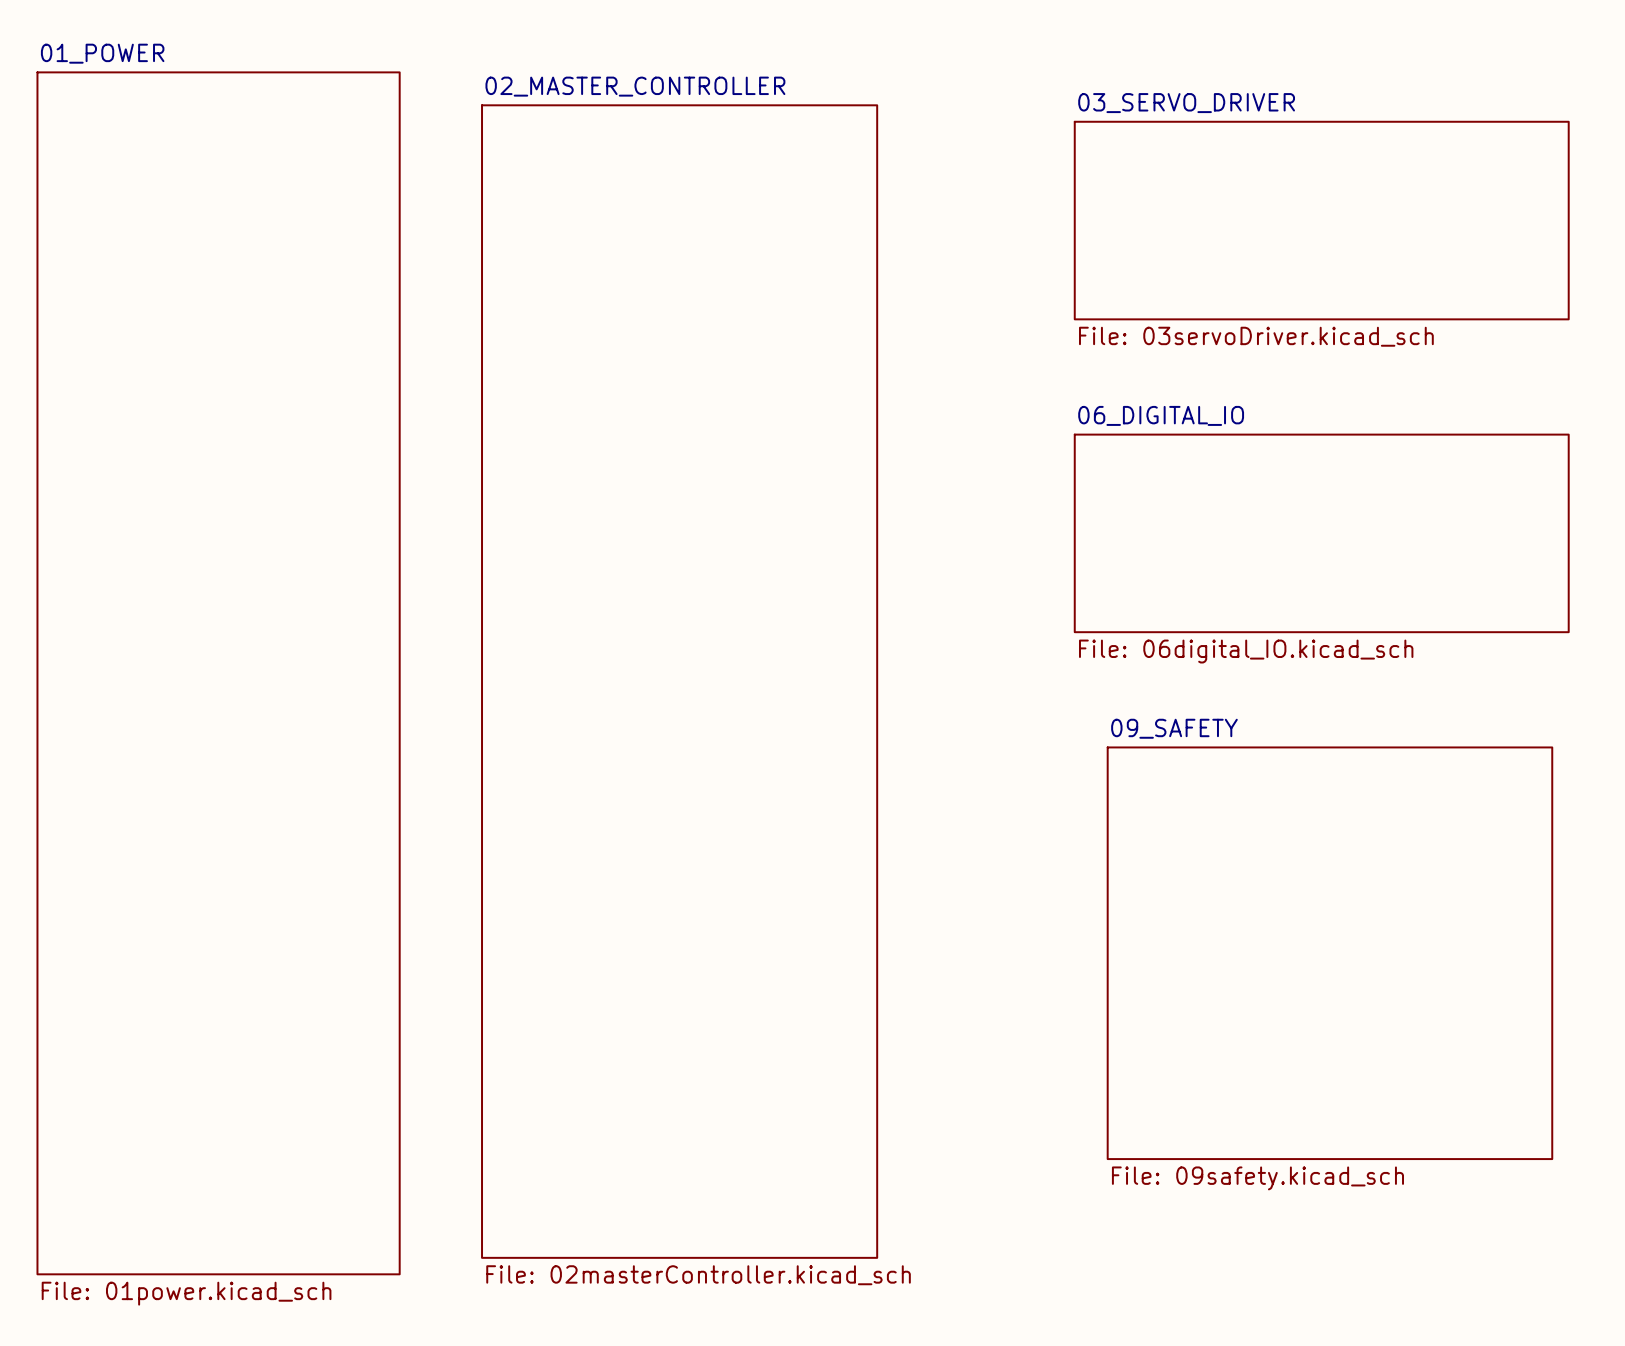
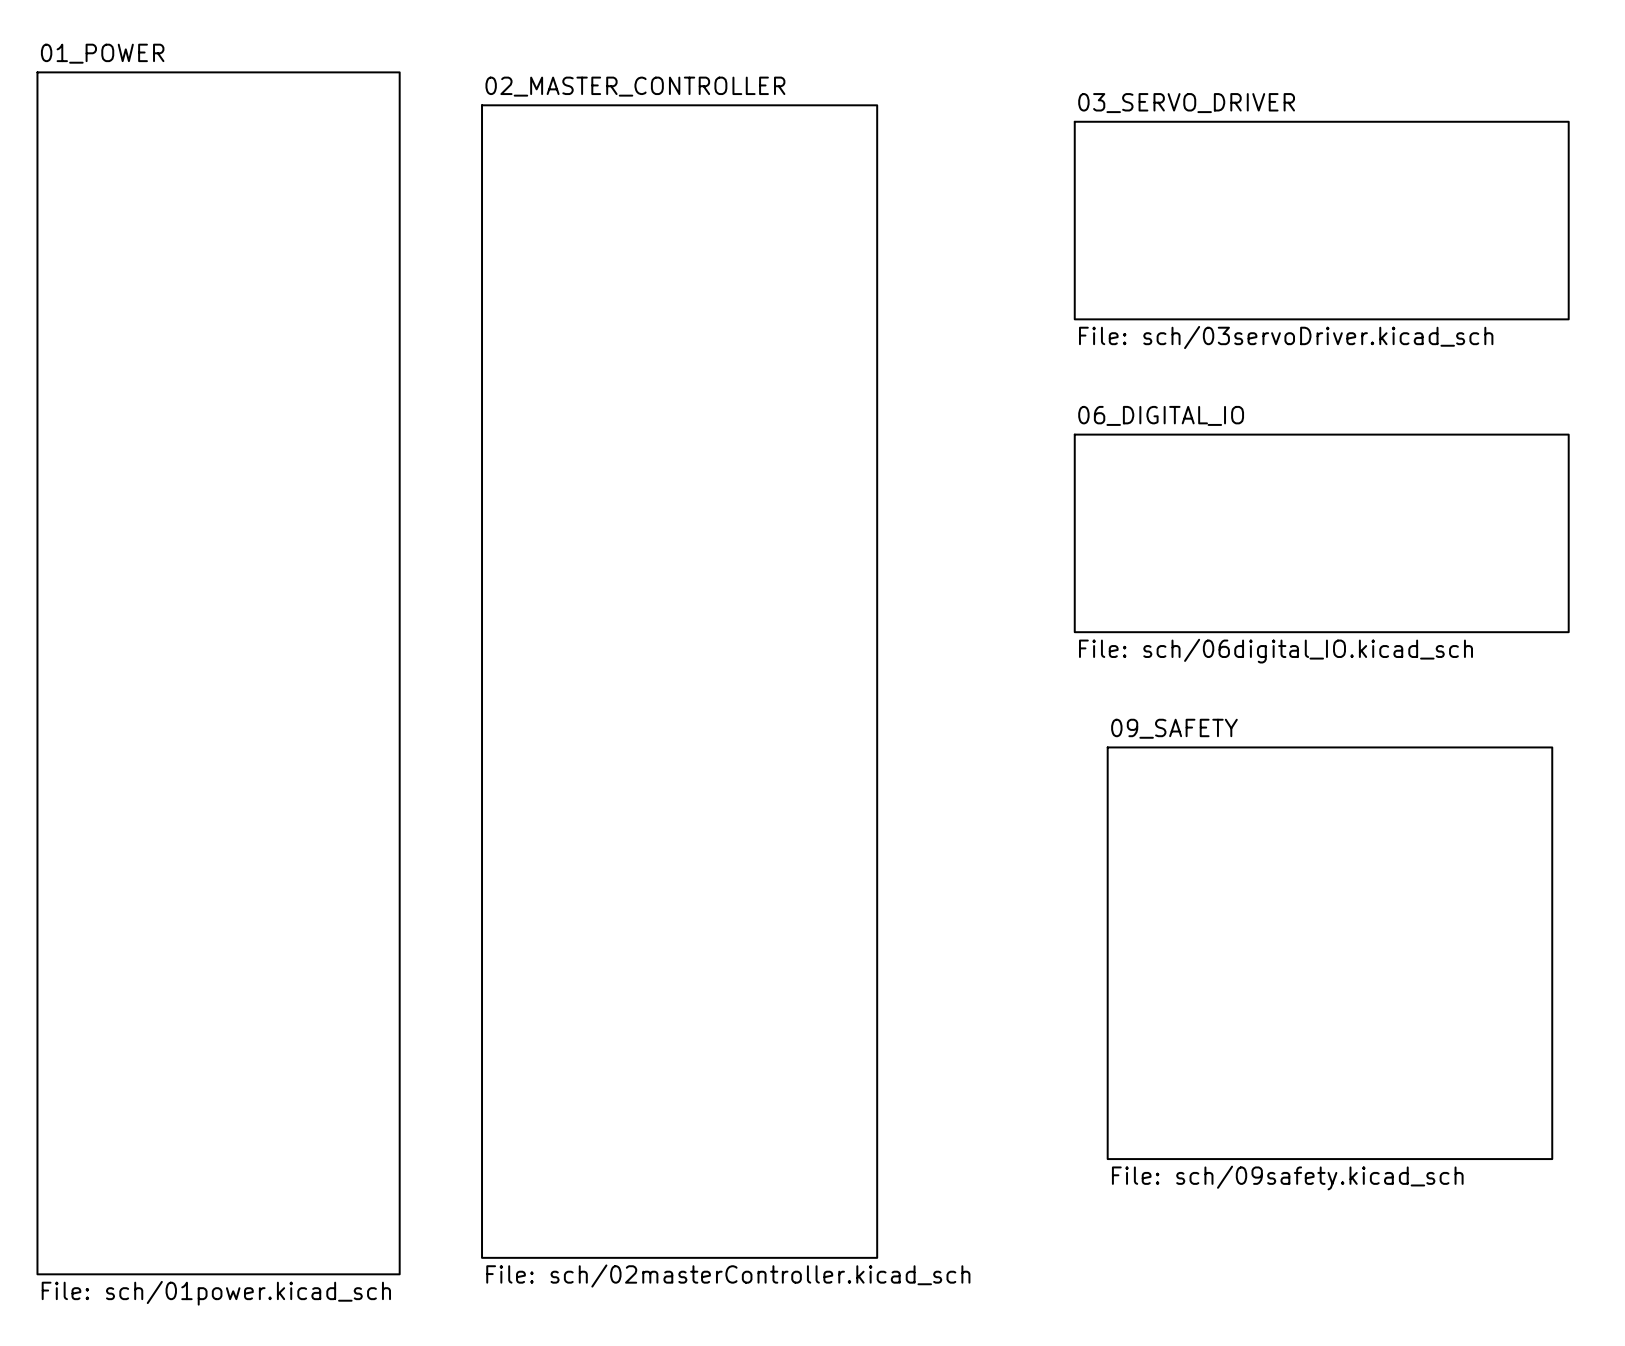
sheet 03_SERVO_DRIVER value: File: 03servoDriver.kicad_sch (1256, 336) -> File: sch/03servoDriver.kicad_sch (1286, 337)
sheet 06_DIGITAL_IO value: File: 06digital_IO.kicad_sch (1246, 651) -> File: sch/06digital_IO.kicad_sch (1275, 651)
sheet 09_SAFETY value: File: 09safety.kicad_sch (1257, 1178) -> File: sch/09safety.kicad_sch (1287, 1178)
sheet 02_MASTER_CONTROLLER value: File: 02masterController.kicad_sch (698, 1275) -> File: sch/02masterController.kicad_sch (728, 1276)
sheet 01_POWER value: File: 01power.kicad_sch (186, 1293) -> File: sch/01power.kicad_sch (216, 1293)

